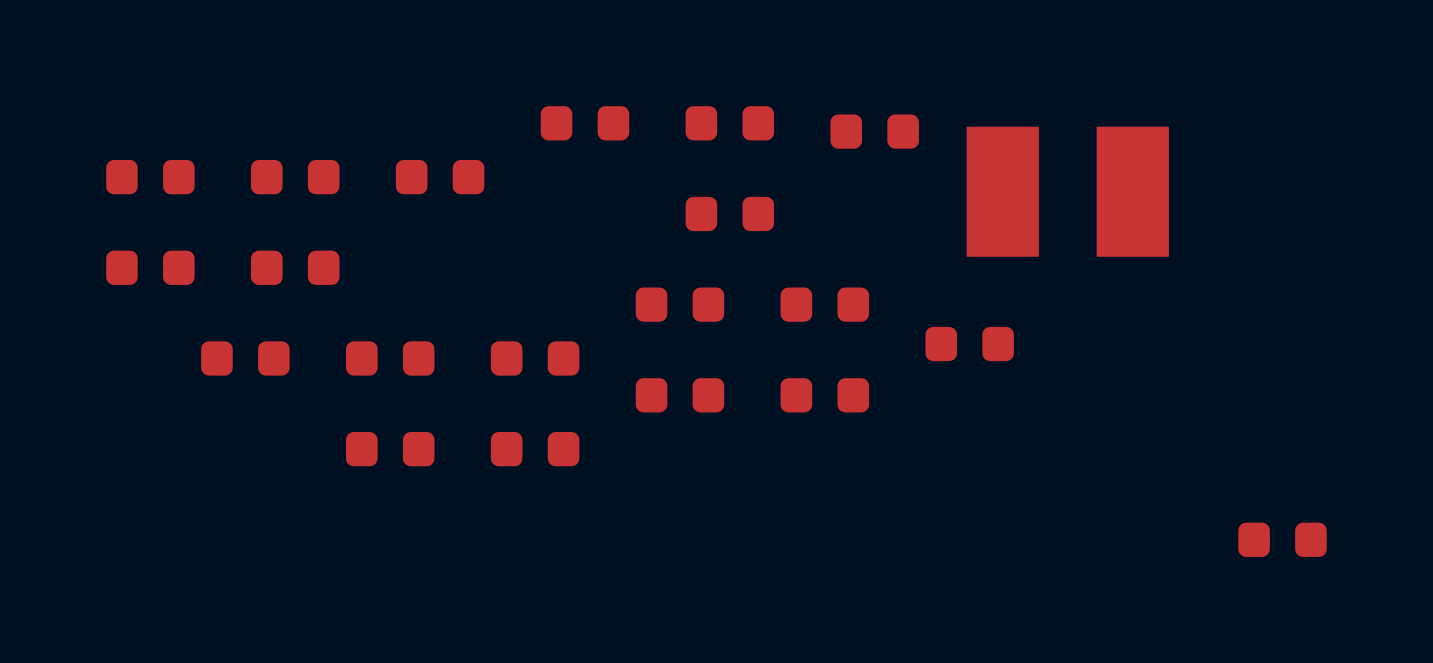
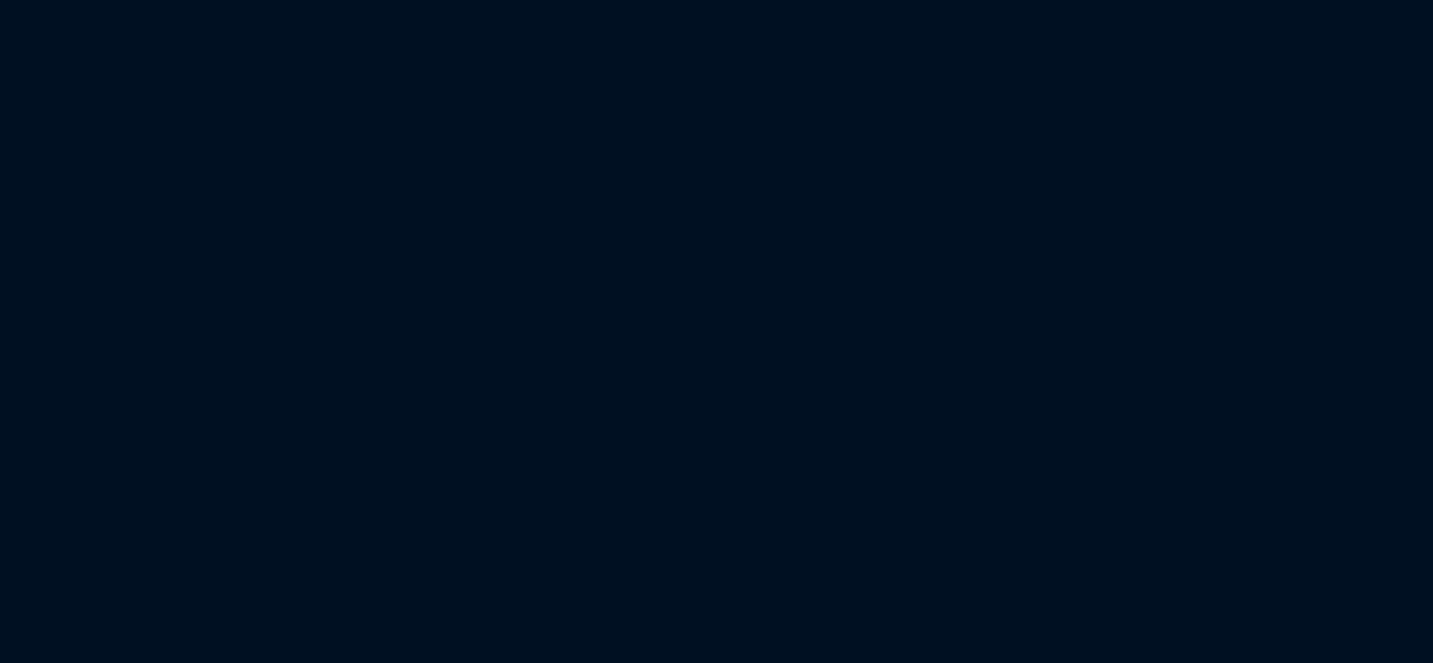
part: (584, 123) -> none
part: (729, 123) -> none
part: (874, 131) -> none
part: (150, 177) -> none
part: (295, 177) -> none
part: (440, 177) -> none
part: (1067, 191) -> none
part: (729, 213) -> none
part: (150, 267) -> none
part: (295, 267) -> none
part: (679, 304) -> none
part: (824, 304) -> none
part: (969, 344) -> none
part: (245, 358) -> none
part: (390, 358) -> none
part: (535, 358) -> none
part: (679, 395) -> none
part: (824, 395) -> none
part: (390, 449) -> none
part: (535, 449) -> none
part: (1282, 539) -> none

